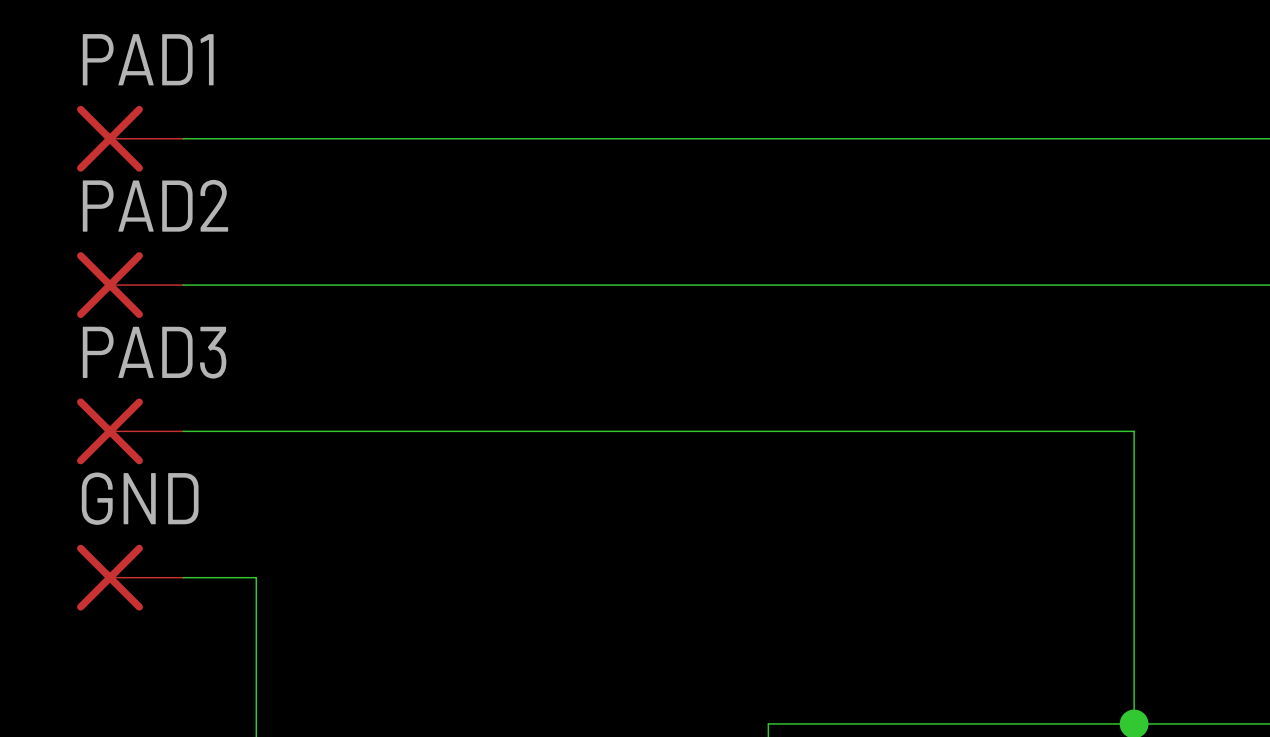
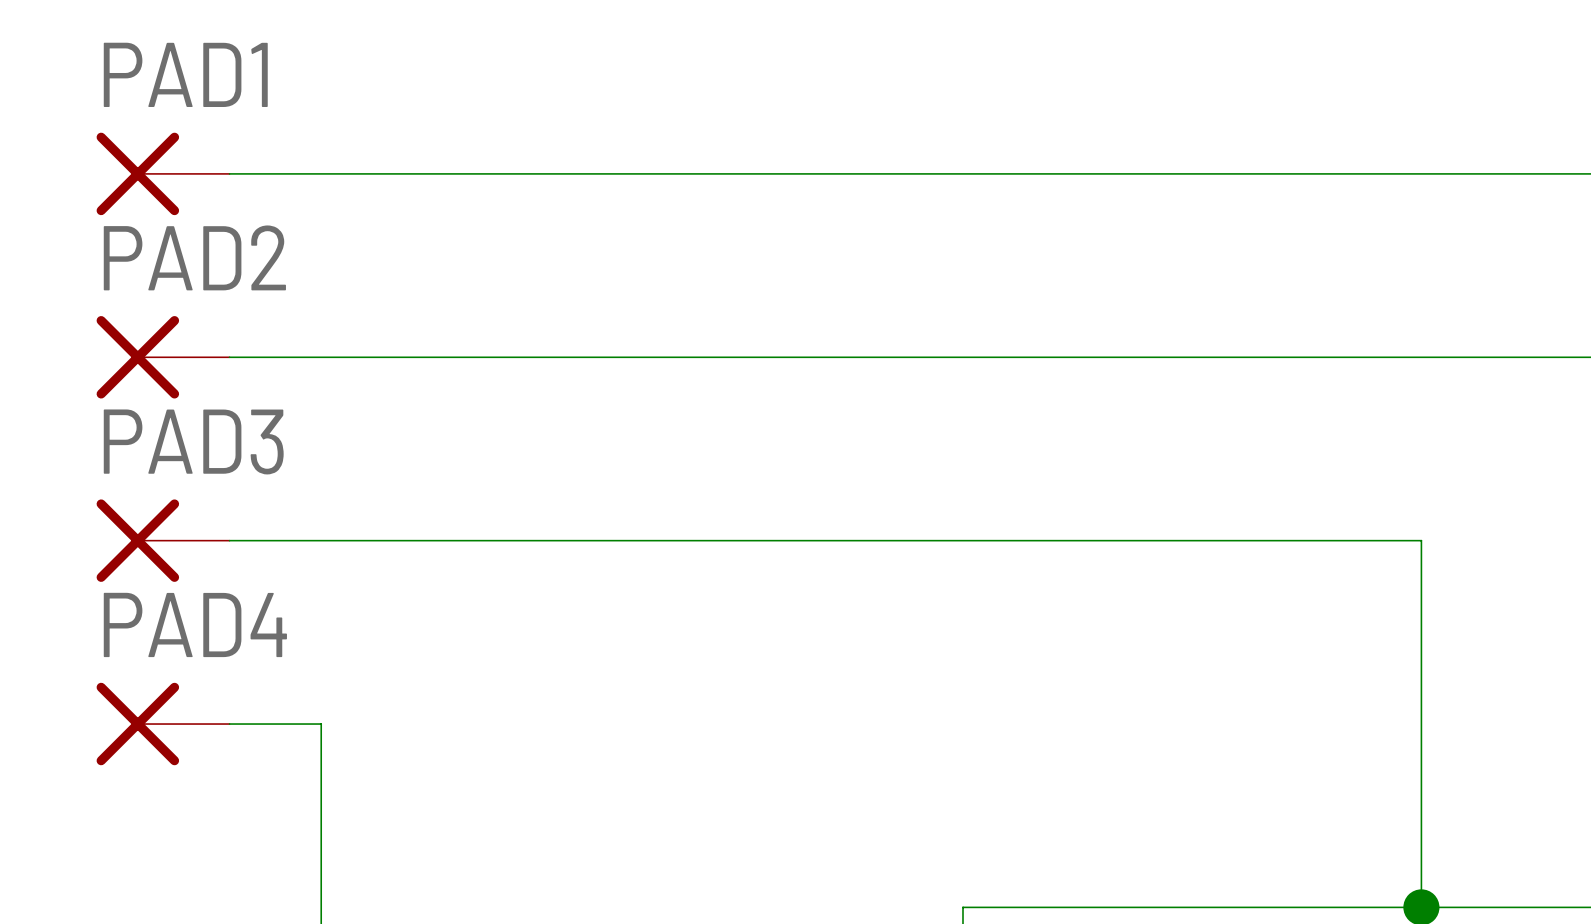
GND name: GND (140, 498) -> PAD4 (195, 624)

